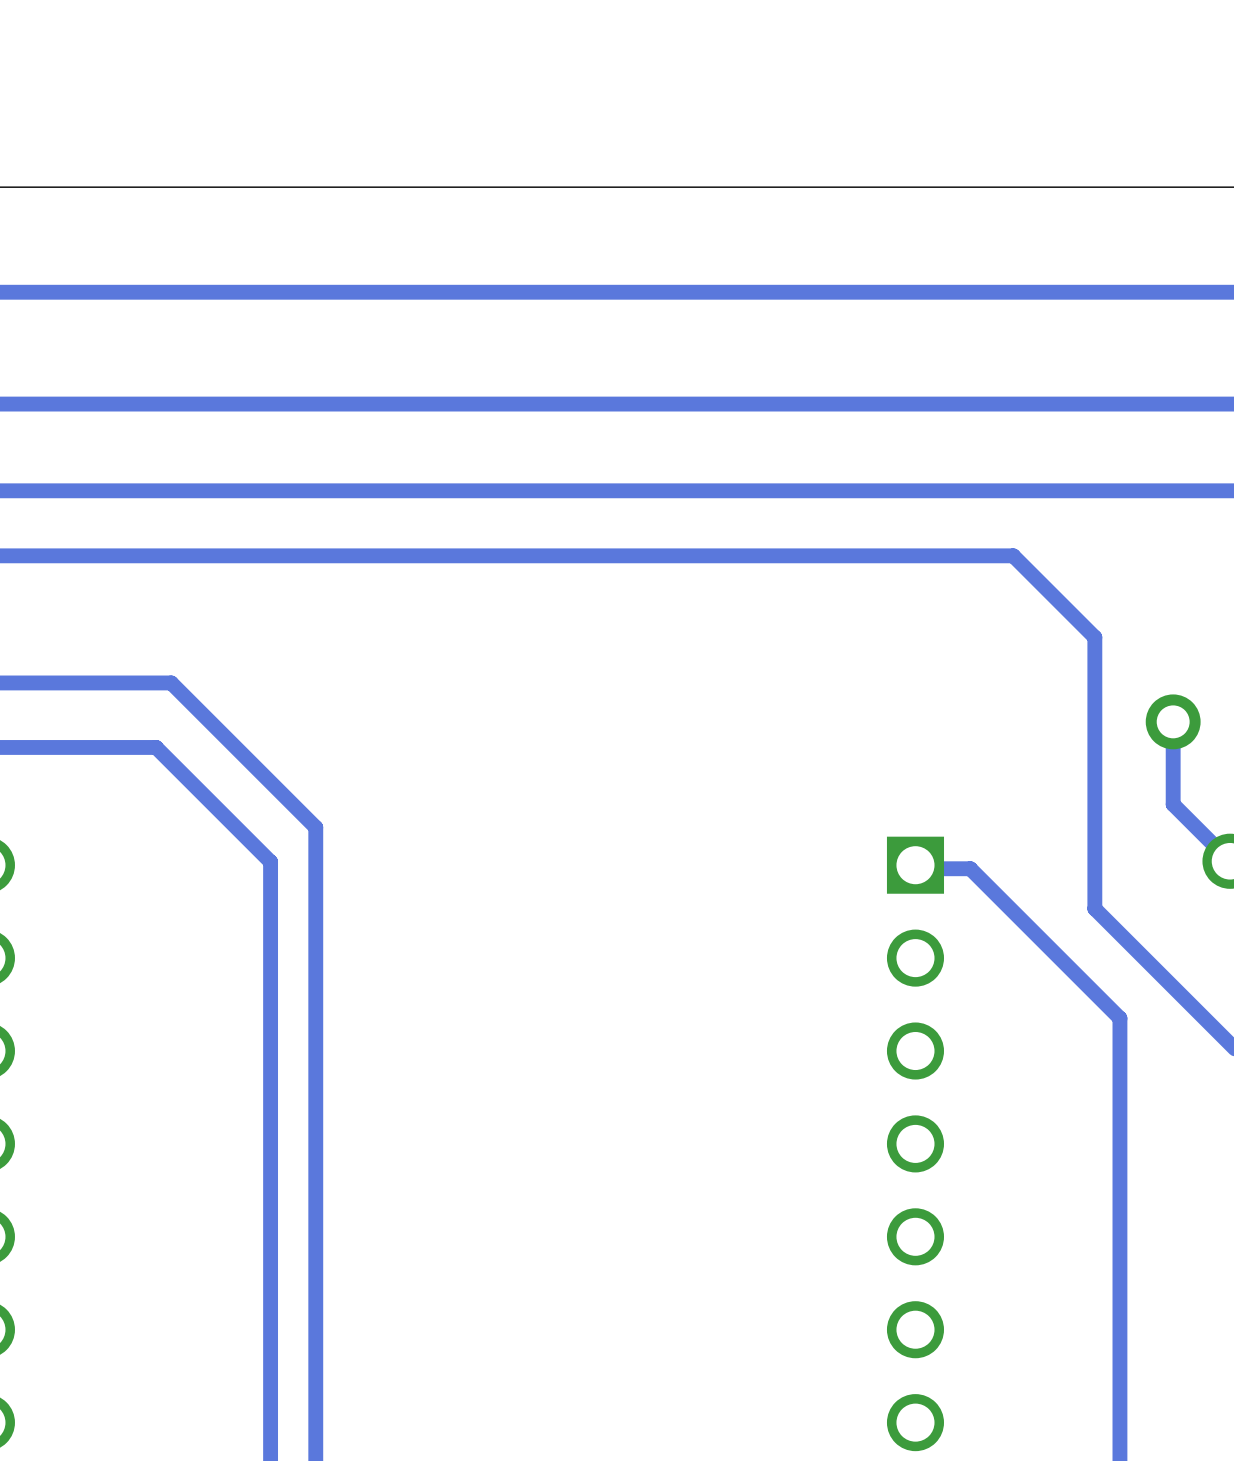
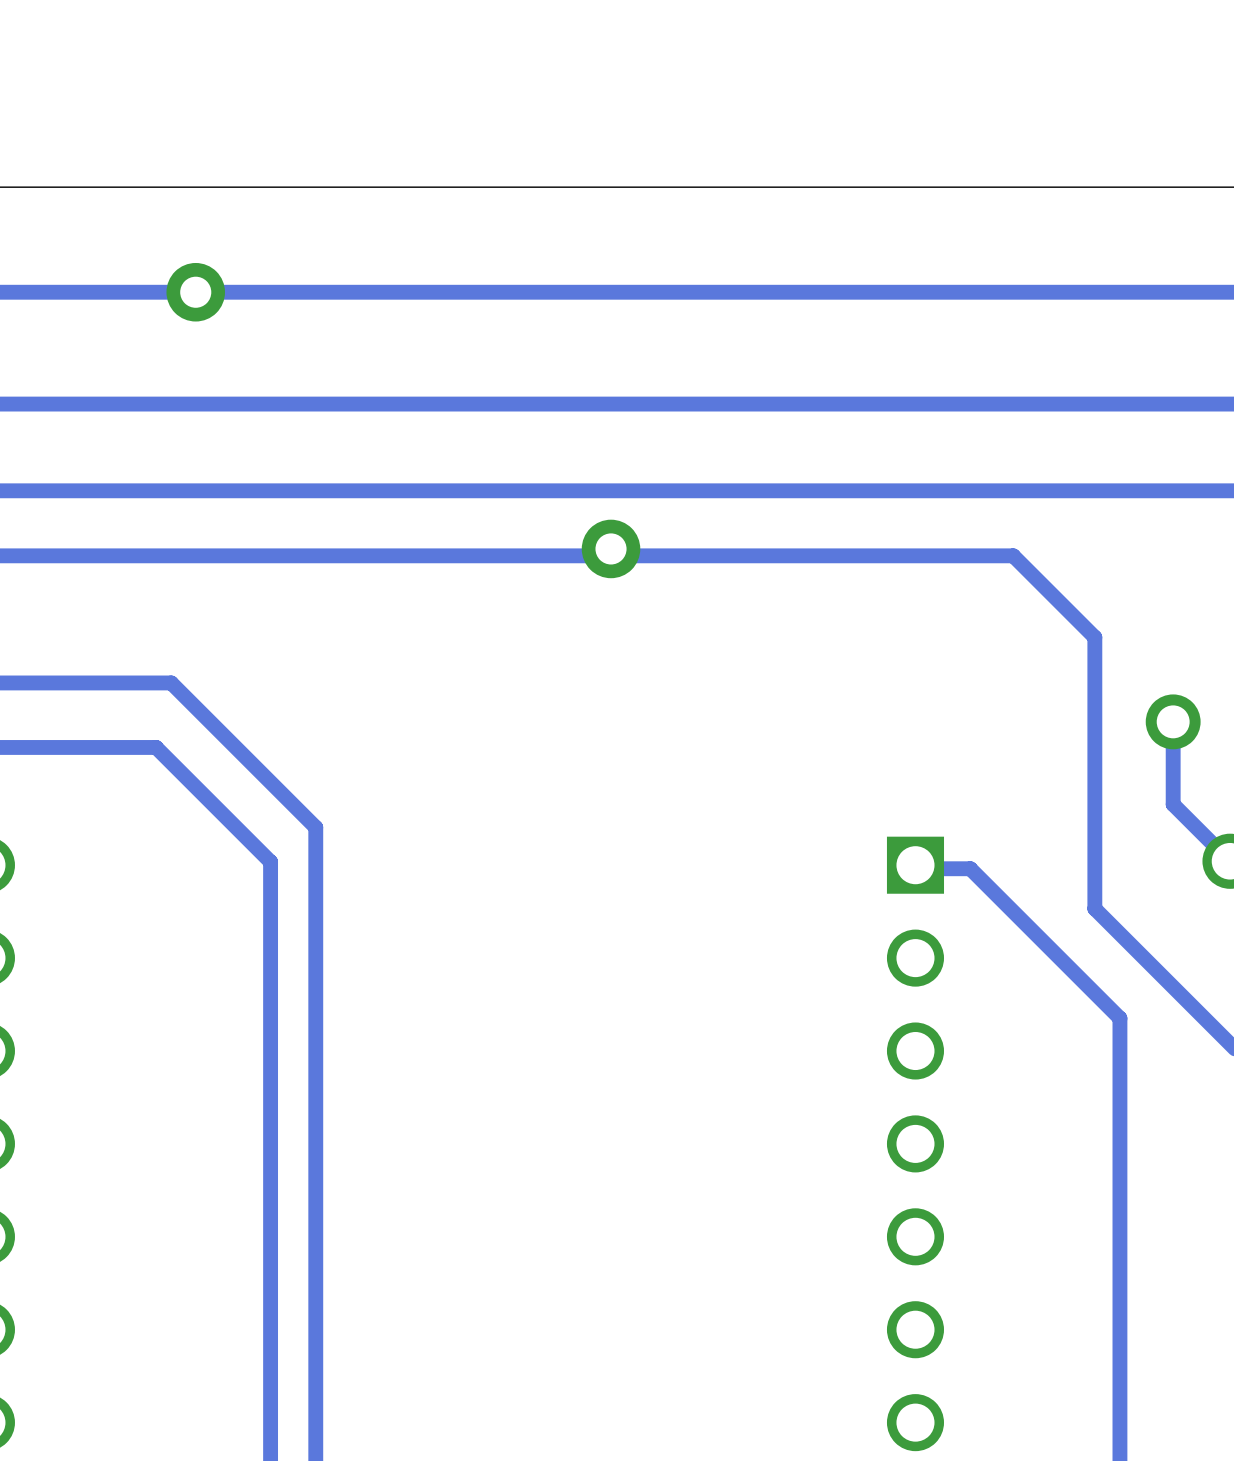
via: none -> (195, 292)
via: none -> (611, 548)

